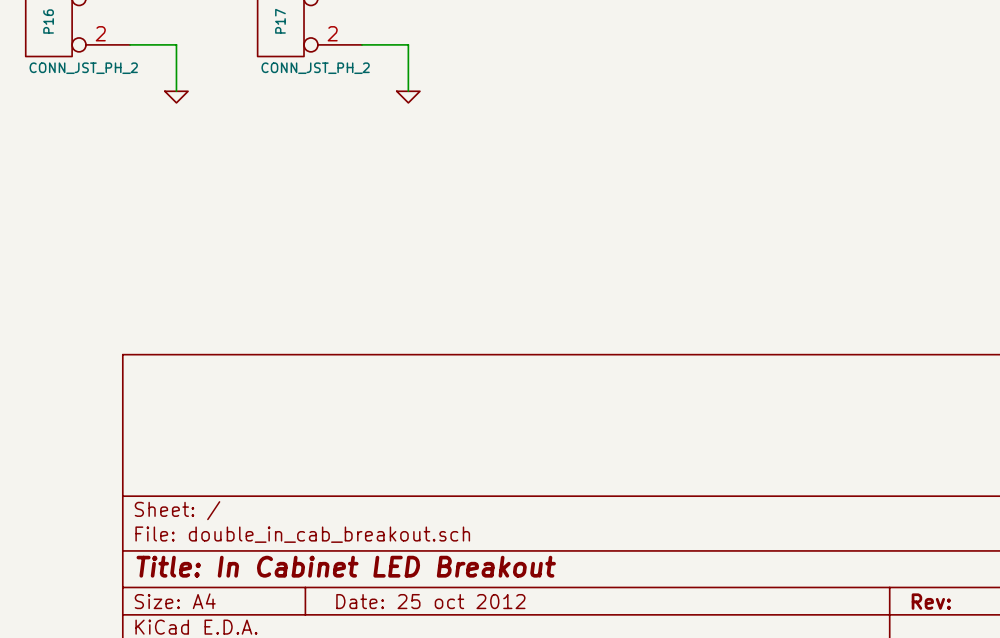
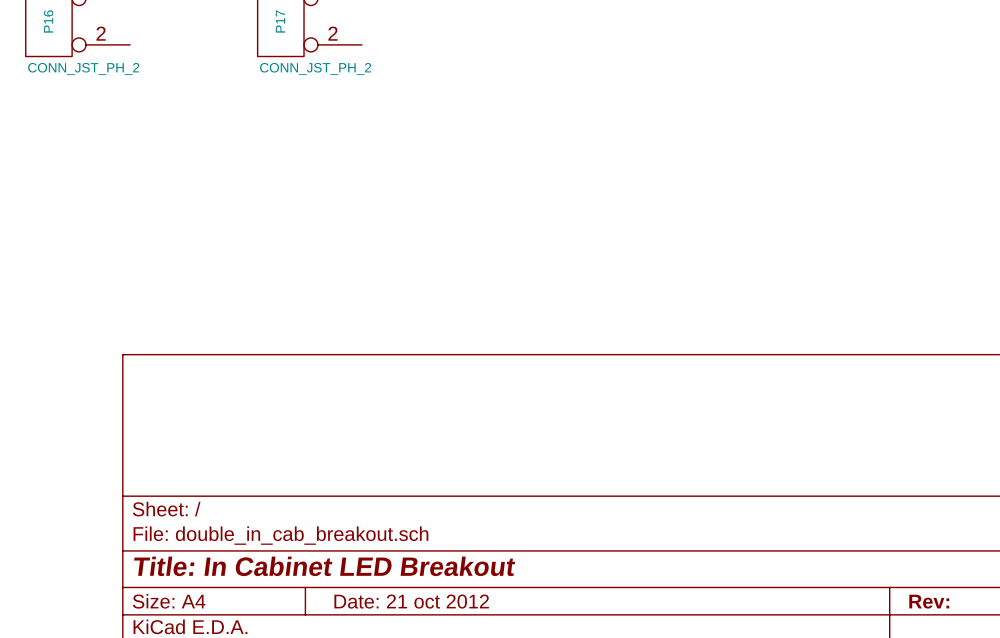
wire: (130, 44) (176, 44) (176, 91) -> none
wire: (361, 44) (408, 44) (408, 91) -> none
power symbol: (176, 97) -> none
power symbol: (408, 97) -> none
title block: Date: 25 oct 2012 (430, 601) -> Date: 21 oct 2012 (411, 601)

